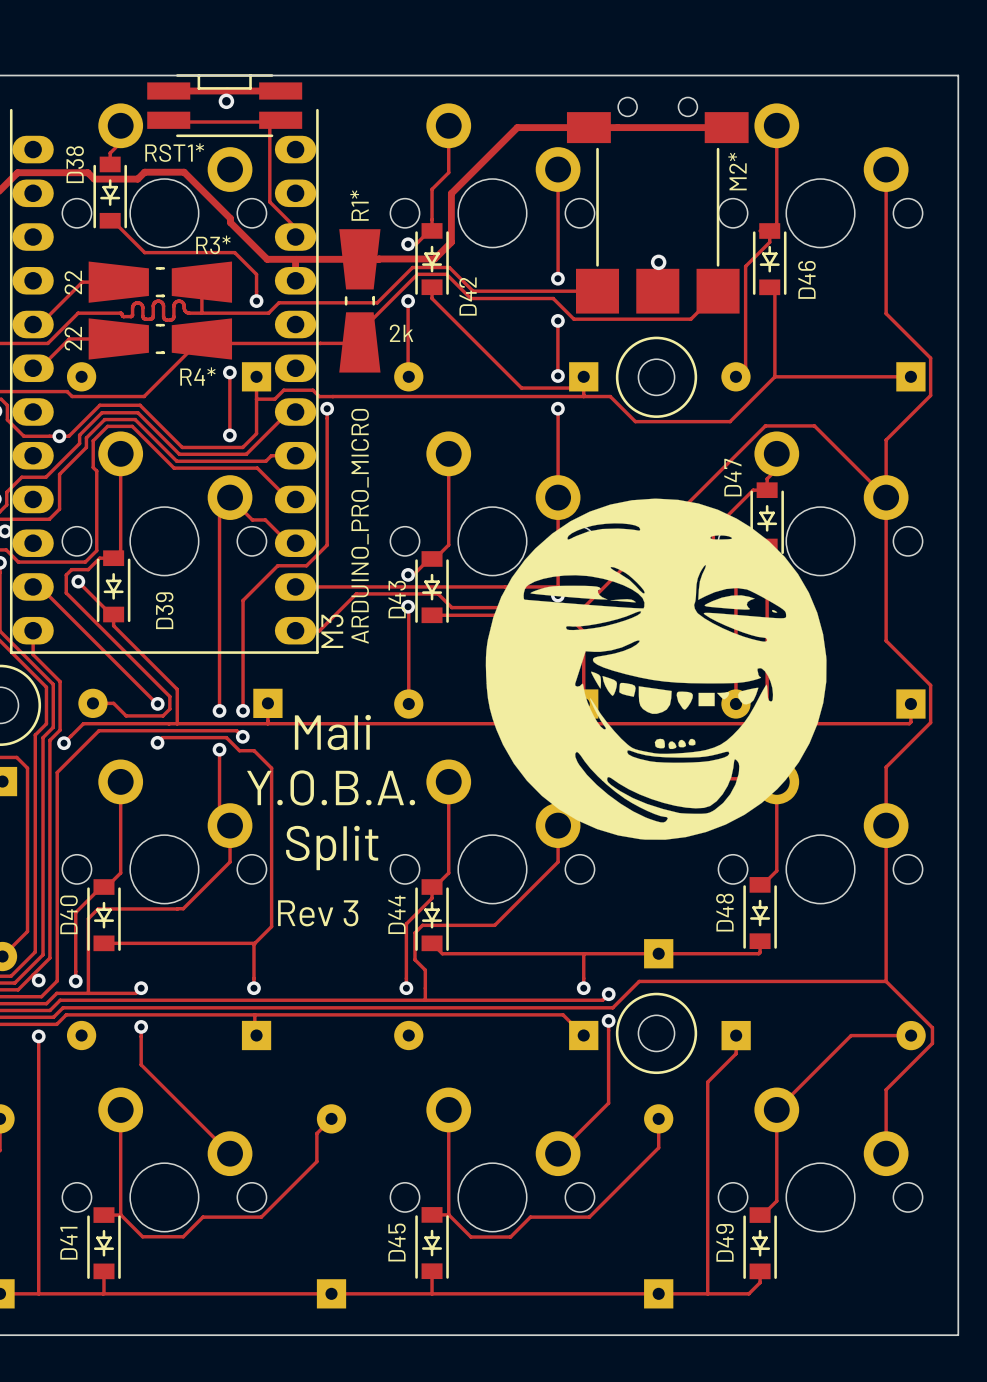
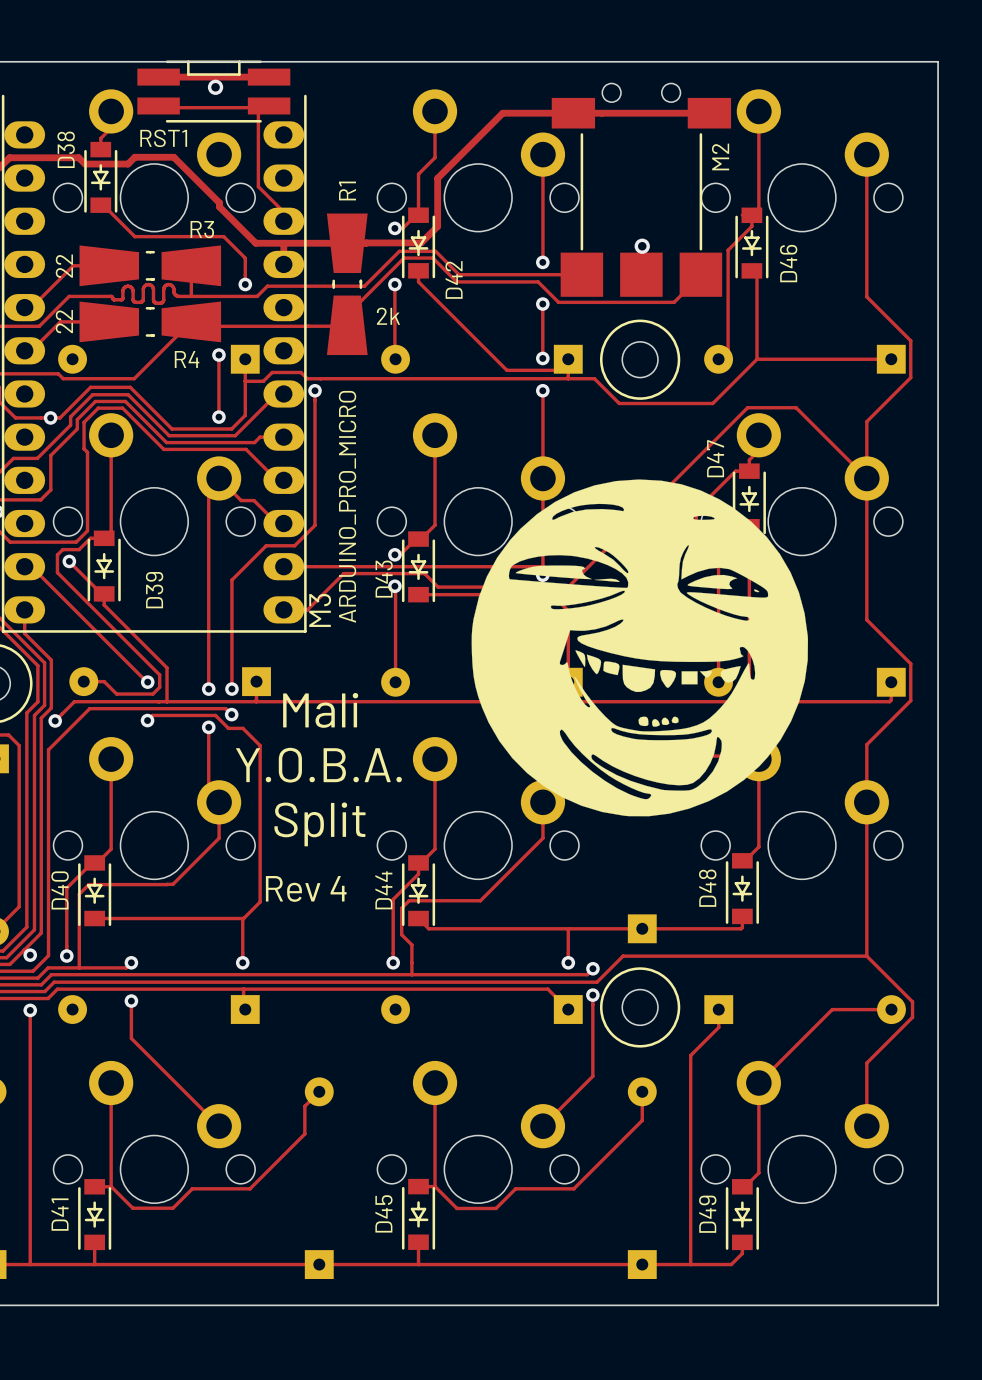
RST1* name: RST1* (174, 152) -> RST1 (163, 138)
M2* name: M2* (737, 171) -> M2 (720, 156)
R1* name: R1* (359, 205) -> R1 (347, 190)
R3* name: R3* (213, 244) -> R3 (202, 229)
R4* name: R4* (197, 376) -> R4 (187, 359)
text: Rev 3 (318, 913) -> Rev 4 (306, 888)

